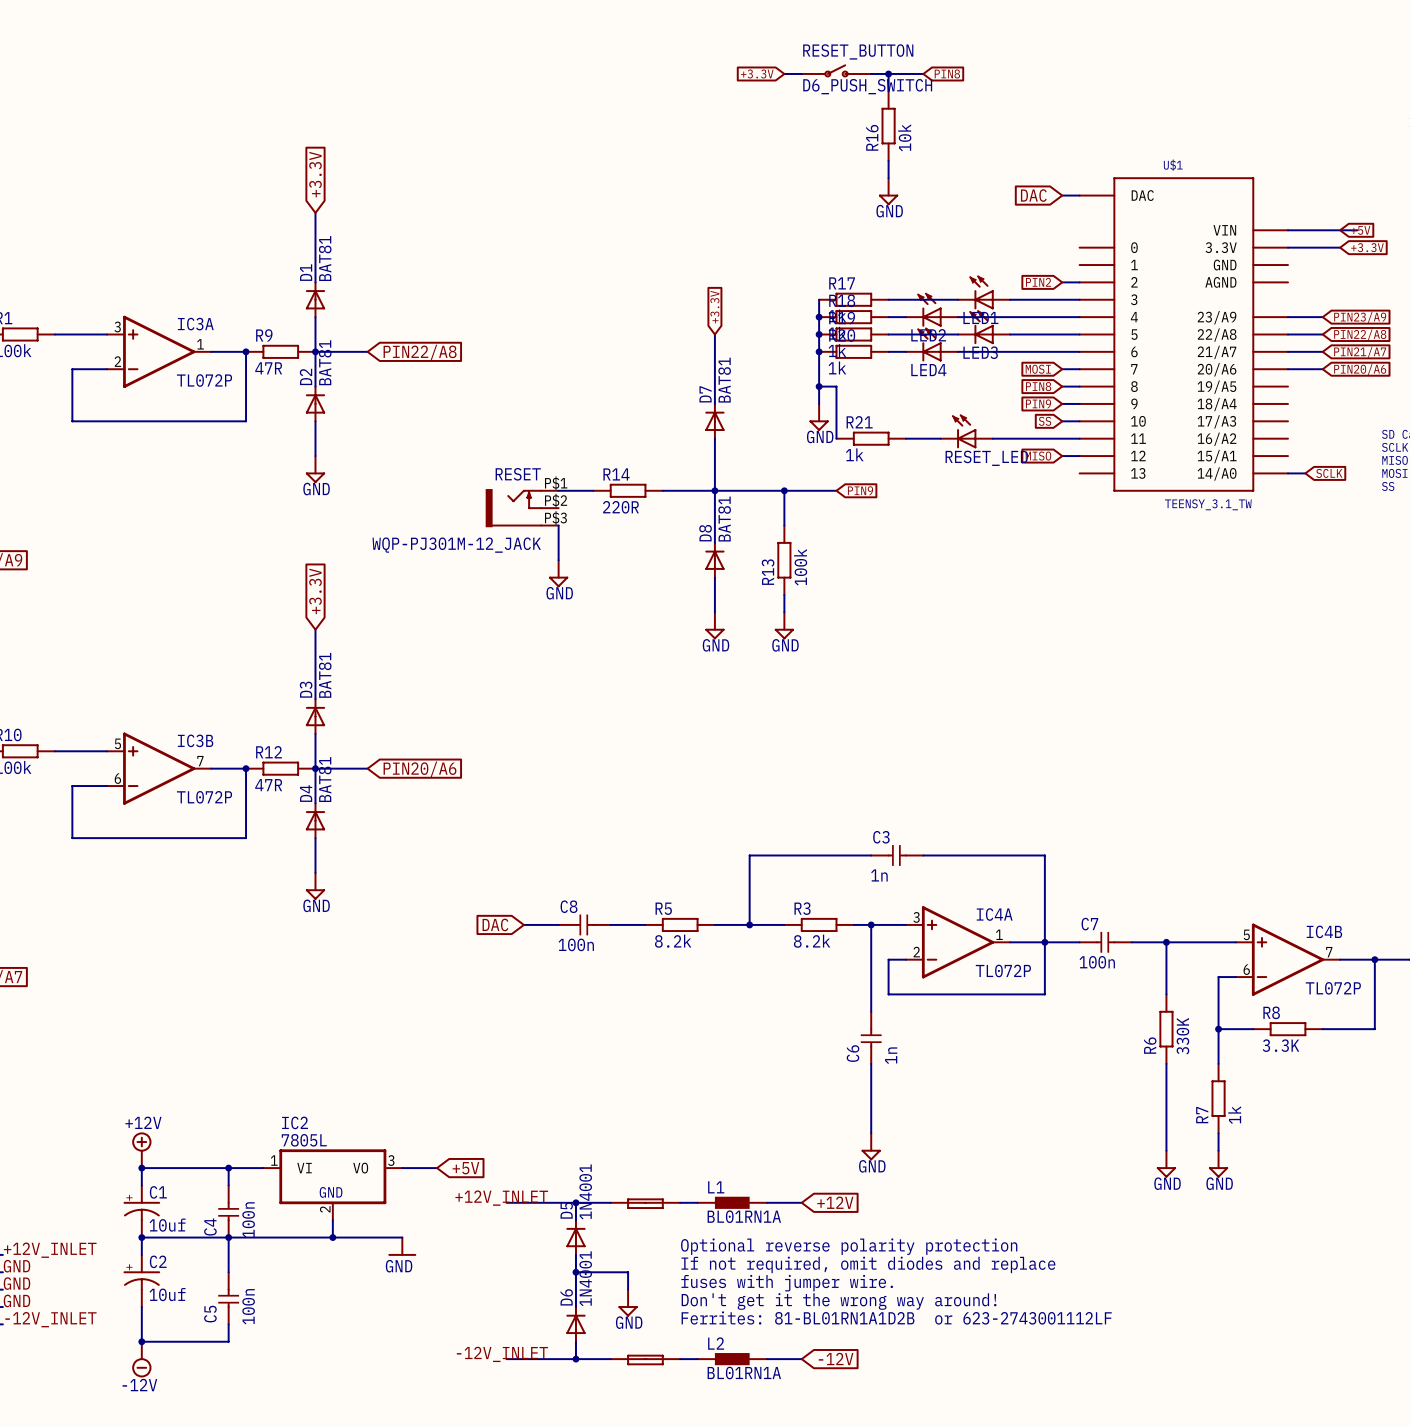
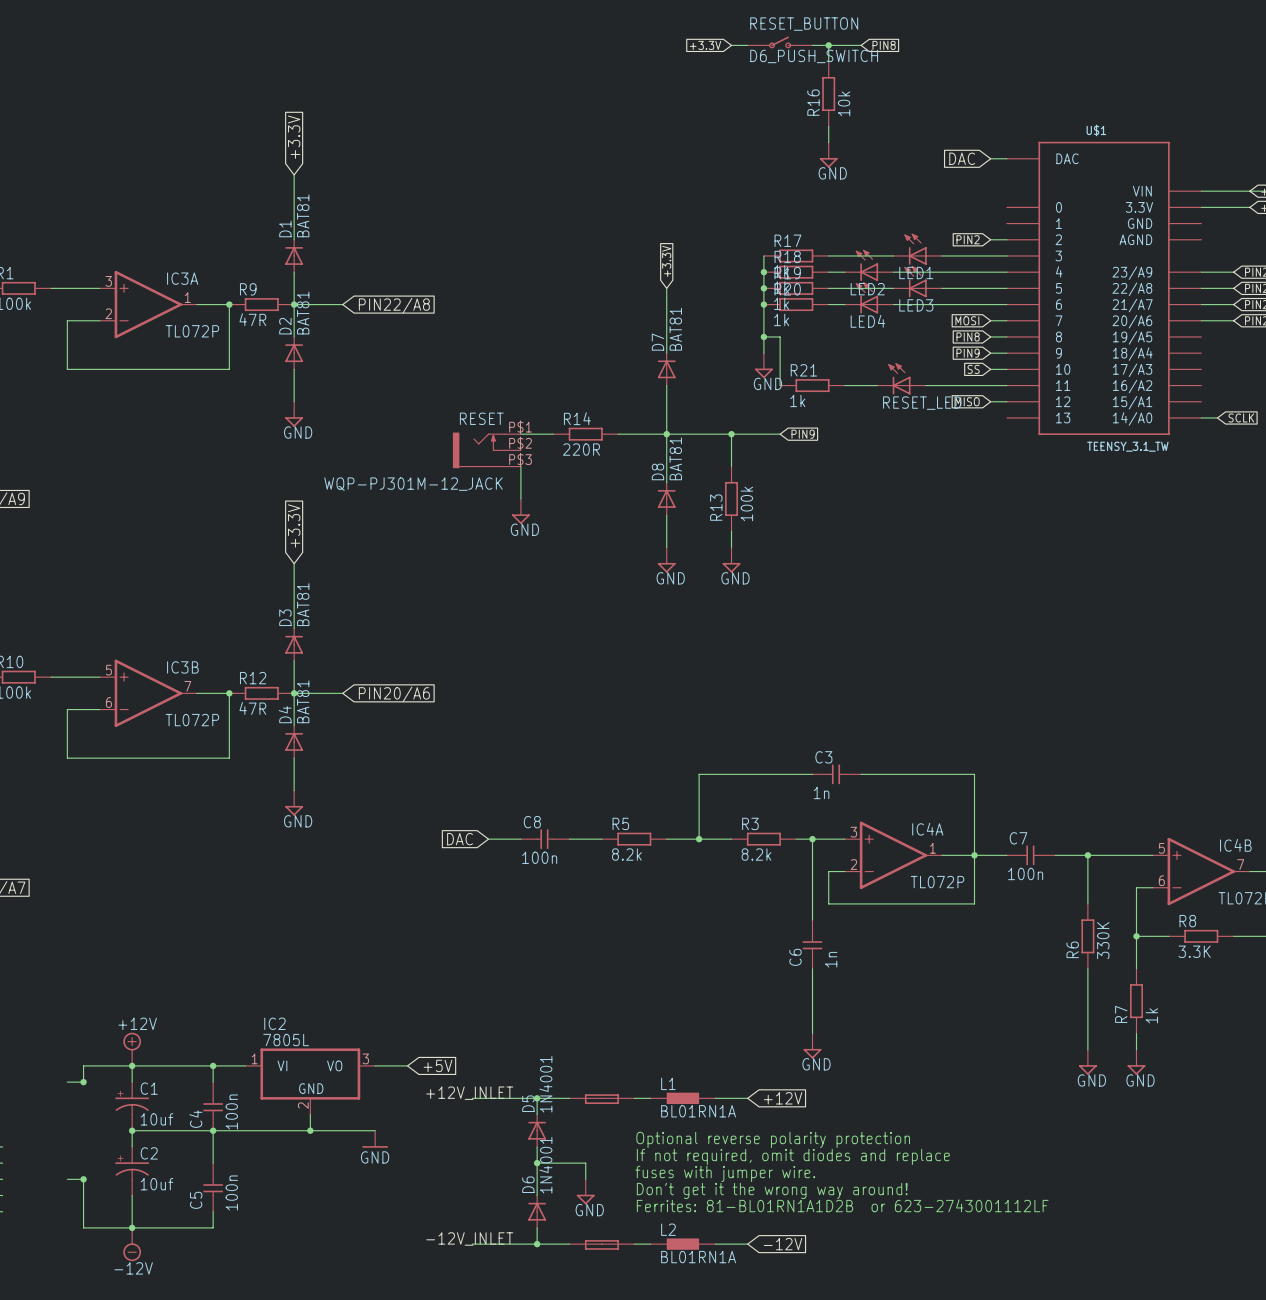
wire: none -> (132, 1065) (83, 1065) (83, 1082) (67, 1082)
junction: none -> (83, 1082)
label: +12V_INLET (50, 1250) -> none
label: GND (17, 1266) -> none
label: GND (17, 1283) -> none
wire: none -> (67, 1179) (83, 1179) (83, 1227) (132, 1227)
junction: none -> (83, 1179)
label: GND (17, 1300) -> none
label: -12V_INLET (50, 1319) -> none

